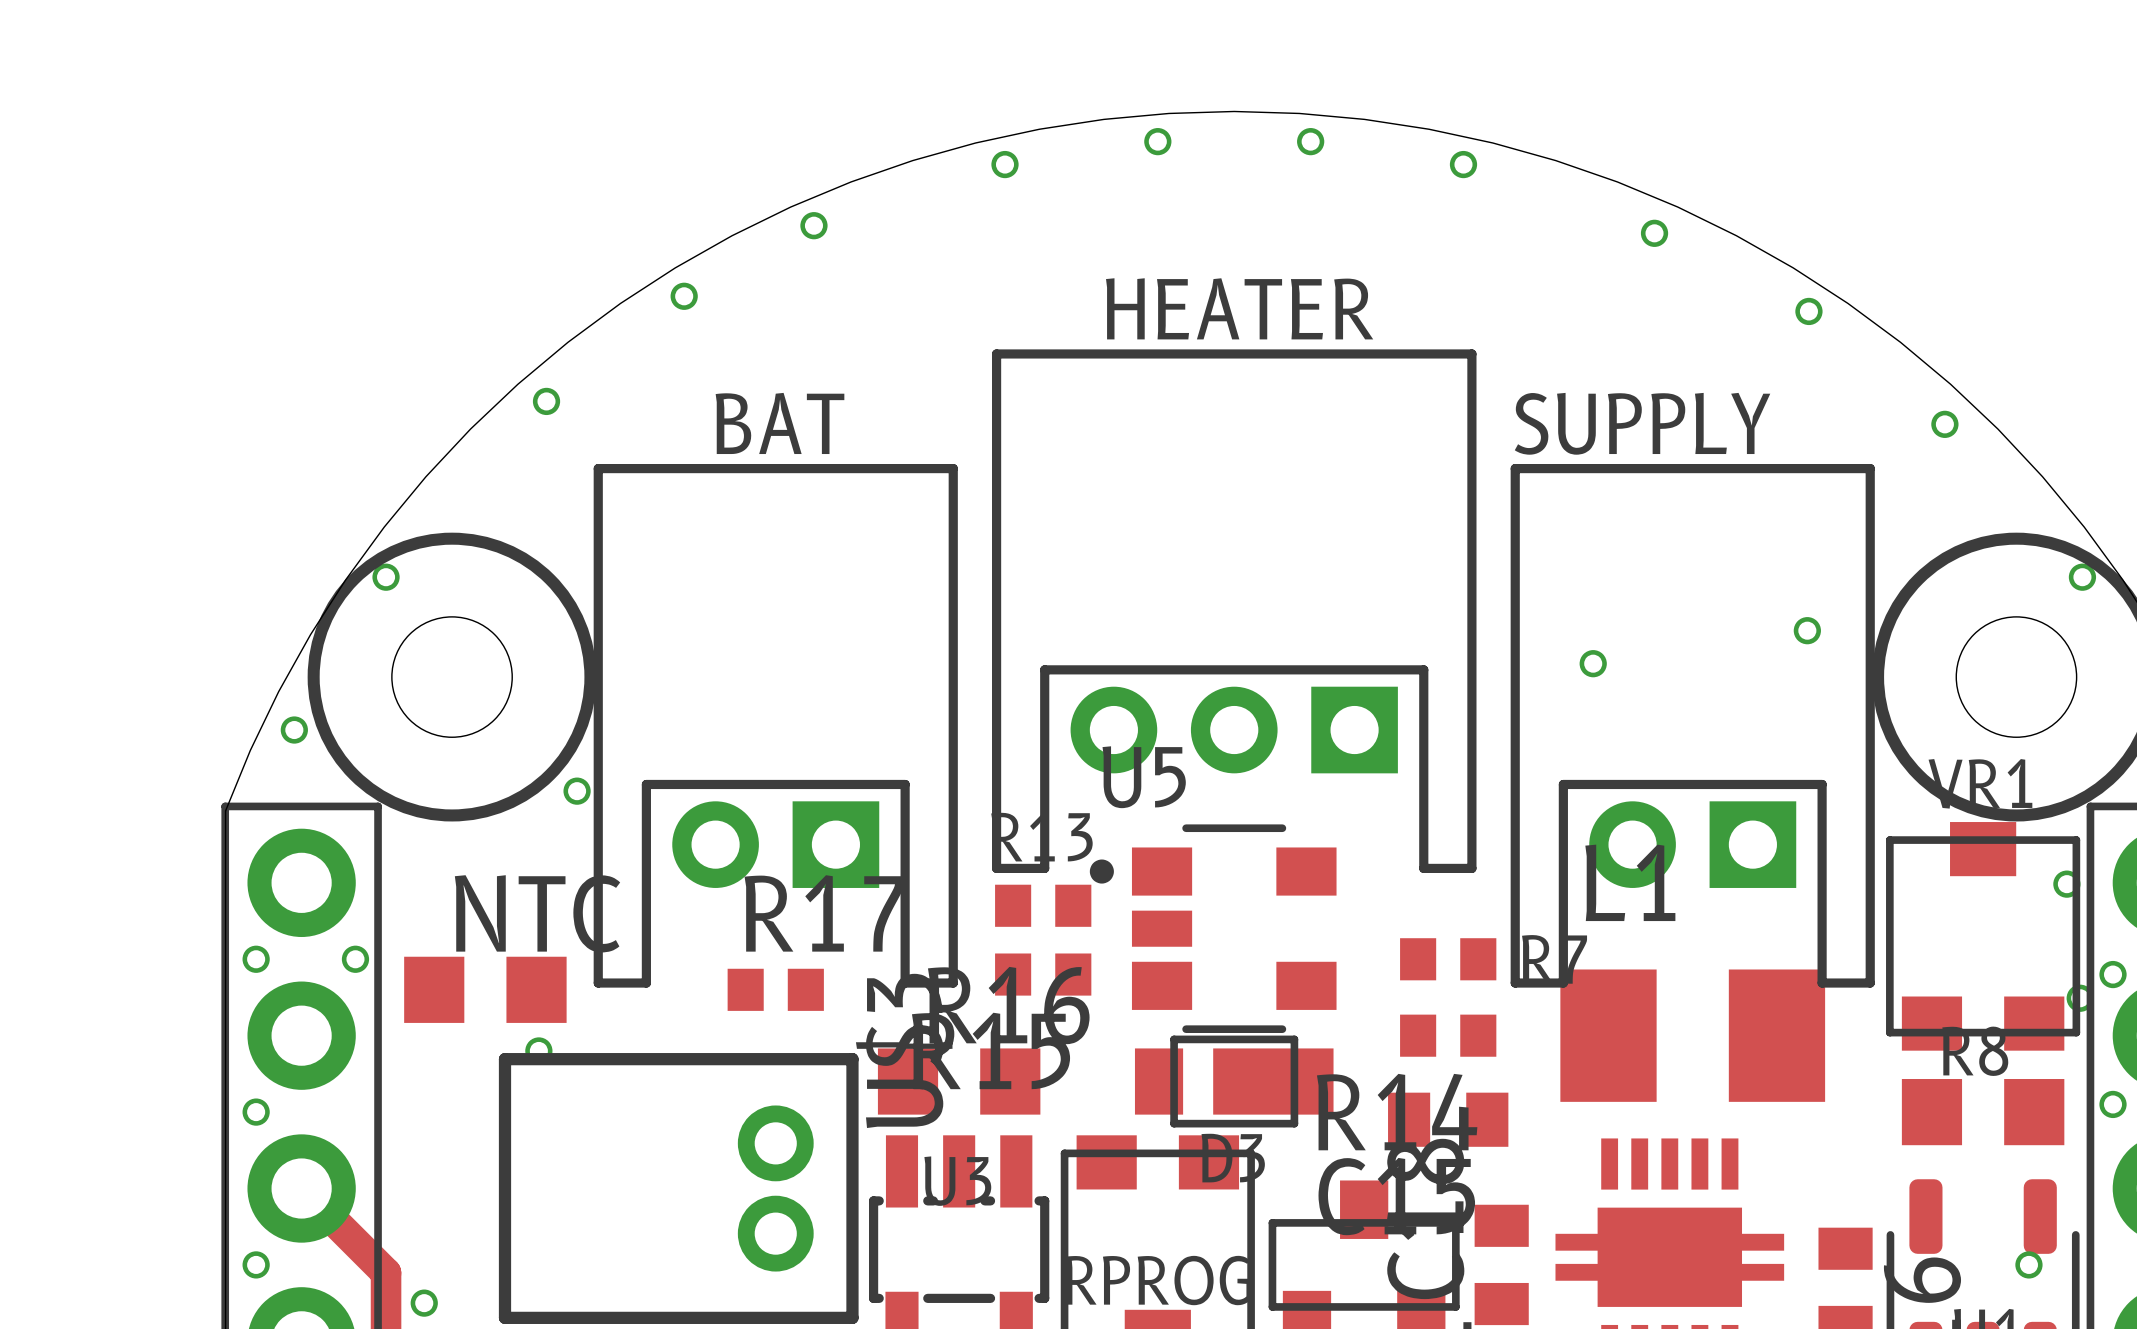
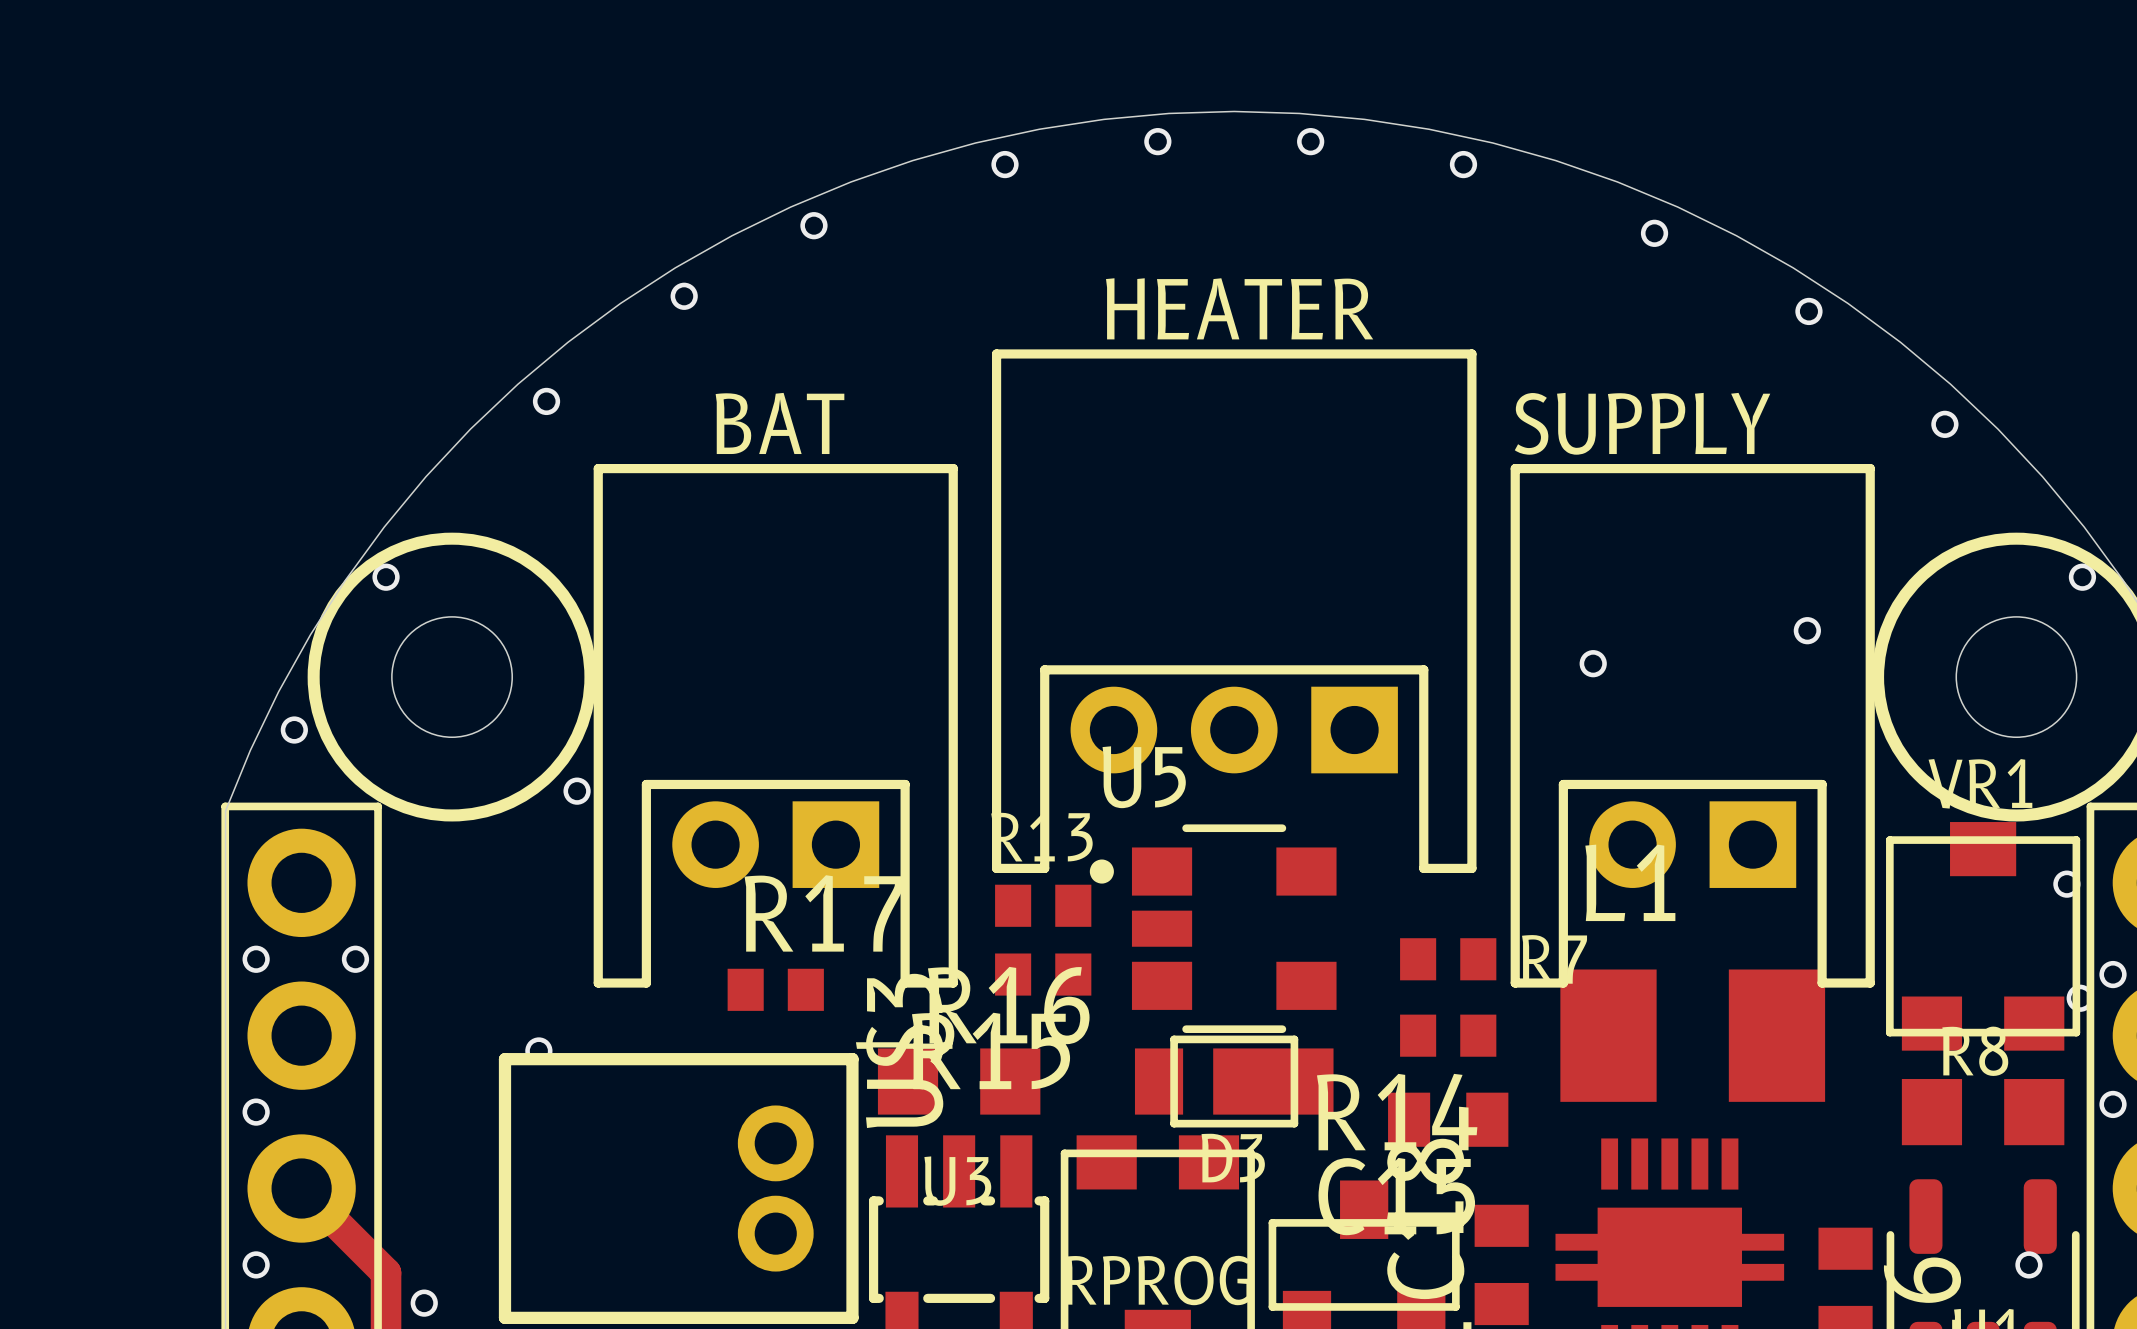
NTC: (485, 989) -> none

